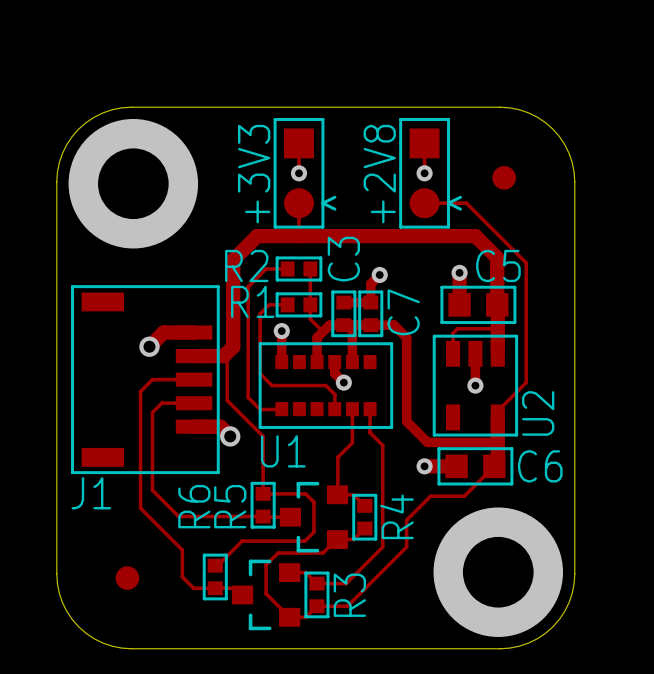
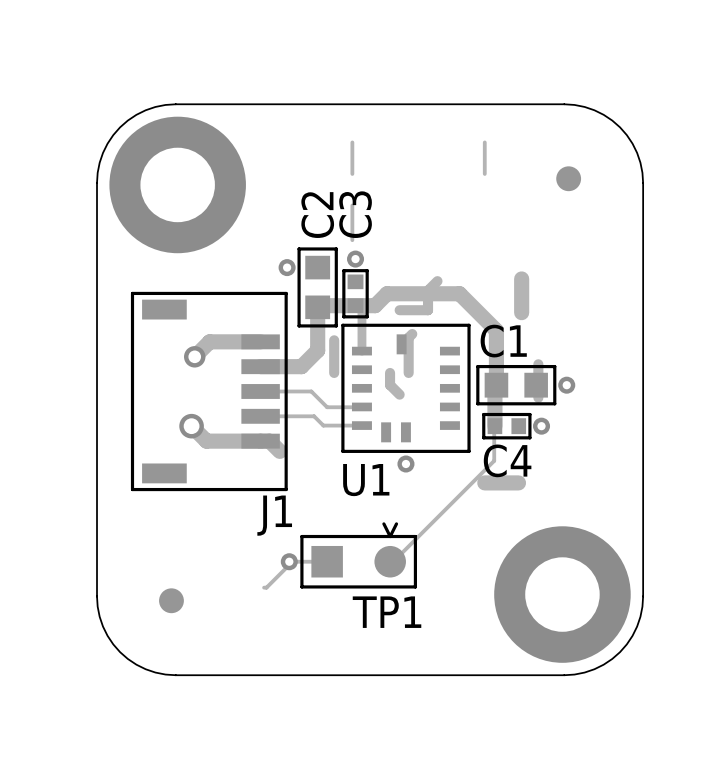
via: (299, 173) -> none
part: (304, 173) -> none
via: (424, 173) -> none
part: (430, 173) -> none
text: +3V3 (254, 174) -> none
text: +2V8 (379, 174) -> none
track: (424, 203) (466, 203) (526, 263) (526, 382) (497, 411) (497, 417) -> none
via: none -> (355, 259)
C3 name position: C3 (343, 259) -> C3 (355, 214)
via: none -> (287, 267)
track: (287, 268) (266, 268) (248, 286) (248, 397) (260, 409) (281, 409) -> none
R2: (299, 268) -> none
track: (310, 268) (310, 319) (322, 331) -> none
via: (459, 272) -> none
via: (379, 274) -> none
C2: none -> (317, 287)
track: none -> (368, 305) (361, 311) (361, 351)
track: (287, 304) (269, 304) (260, 313) (260, 373) (272, 385) (325, 385) (334, 394) (334, 409) -> none
R1: (299, 304) -> none
C5: (478, 304) -> none
C3 position: (343, 313) -> (355, 293)
C7: (370, 313) -> none
track: (497, 328) (457, 328) (453, 333) (453, 353) -> none
via: (281, 331) -> none
U1 footprint: [258, 342, 394, 429] -> [341, 323, 471, 453]
track: (497, 353) (497, 257) (475, 236) (257, 236) (233, 260) (233, 346) (223, 356) (227, 359) (227, 400) (263, 436) (263, 493) (305, 493) (313, 502) (313, 532) (304, 541) (275, 541) -> none
track: none -> (273, 366) (301, 366) (317, 350) (317, 307) (319, 305) (375, 305) (387, 293) (459, 293) (496, 330) (494, 460) (393, 561) (390, 561)
track: (317, 362) (317, 337) (329, 325) (394, 325) (406, 337) (406, 421) (427, 442) (496, 442) (497, 417) -> none
C1: none -> (516, 385)
via: none -> (566, 385)
J1 position: (145, 379) -> (209, 391)
track: (194, 379) (152, 379) (140, 391) (140, 508) (182, 550) (182, 576) (193, 588) (235, 588) (242, 594) -> none
track: none -> (260, 391) (311, 391) (327, 407) (361, 407)
via: (343, 382) -> none
U2: (475, 385) -> none
via: (475, 385) -> none
track: (194, 403) (161, 403) (152, 412) (152, 490) (178, 516) (290, 517) -> none
track: none -> (260, 416) (314, 416) (323, 425) (361, 425)
track: (352, 409) (352, 442) (337, 457) (337, 494) (353, 494) (364, 505) -> none
track: (370, 409) (370, 432) (382, 445) (382, 547) (346, 583) (316, 583) (305, 572) (289, 572) -> none
track: none -> (191, 426) (206, 441) (241, 441)
via: none -> (191, 426)
C4: none -> (506, 426)
via: none -> (541, 426)
track: (497, 417) (497, 462) (464, 496) (430, 496) (406, 520) (406, 547) (347, 606) (316, 606) (305, 617) (289, 617) (266, 593) (266, 565) (278, 553) (322, 553) (336, 539) (353, 539) (364, 528) -> none
via: (230, 436) -> none
via: none -> (405, 464)
via: (424, 466) -> none
C6: (475, 466) -> none
J1 name position: J1 (91, 493) -> J1 (274, 515)
R5: (263, 505) -> none
part: (313, 517) -> none
R4: (364, 517) -> none
TP1: none -> (358, 555)
via: none -> (289, 561)
R6: (215, 576) -> none
part: (266, 594) -> none
R3: (316, 594) -> none

